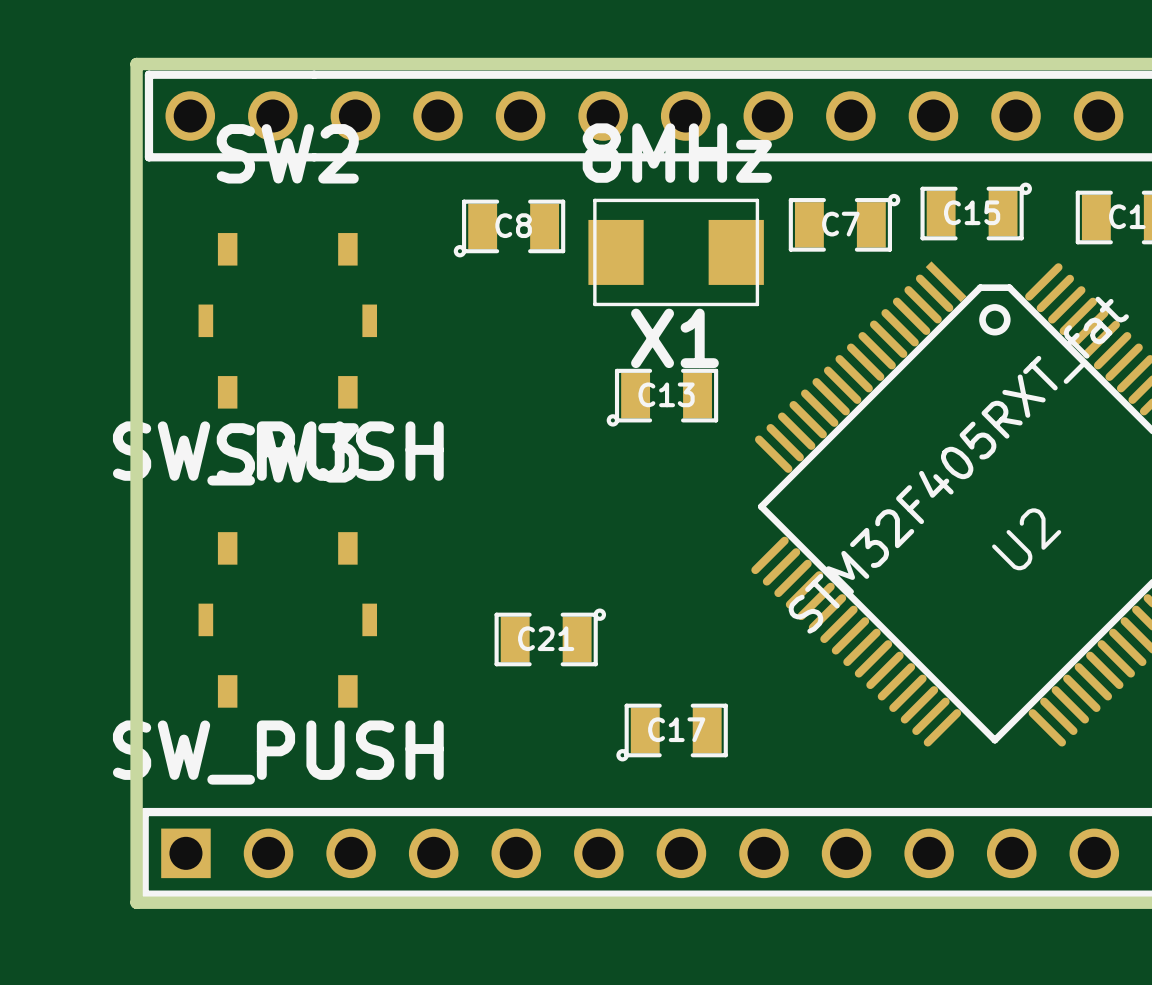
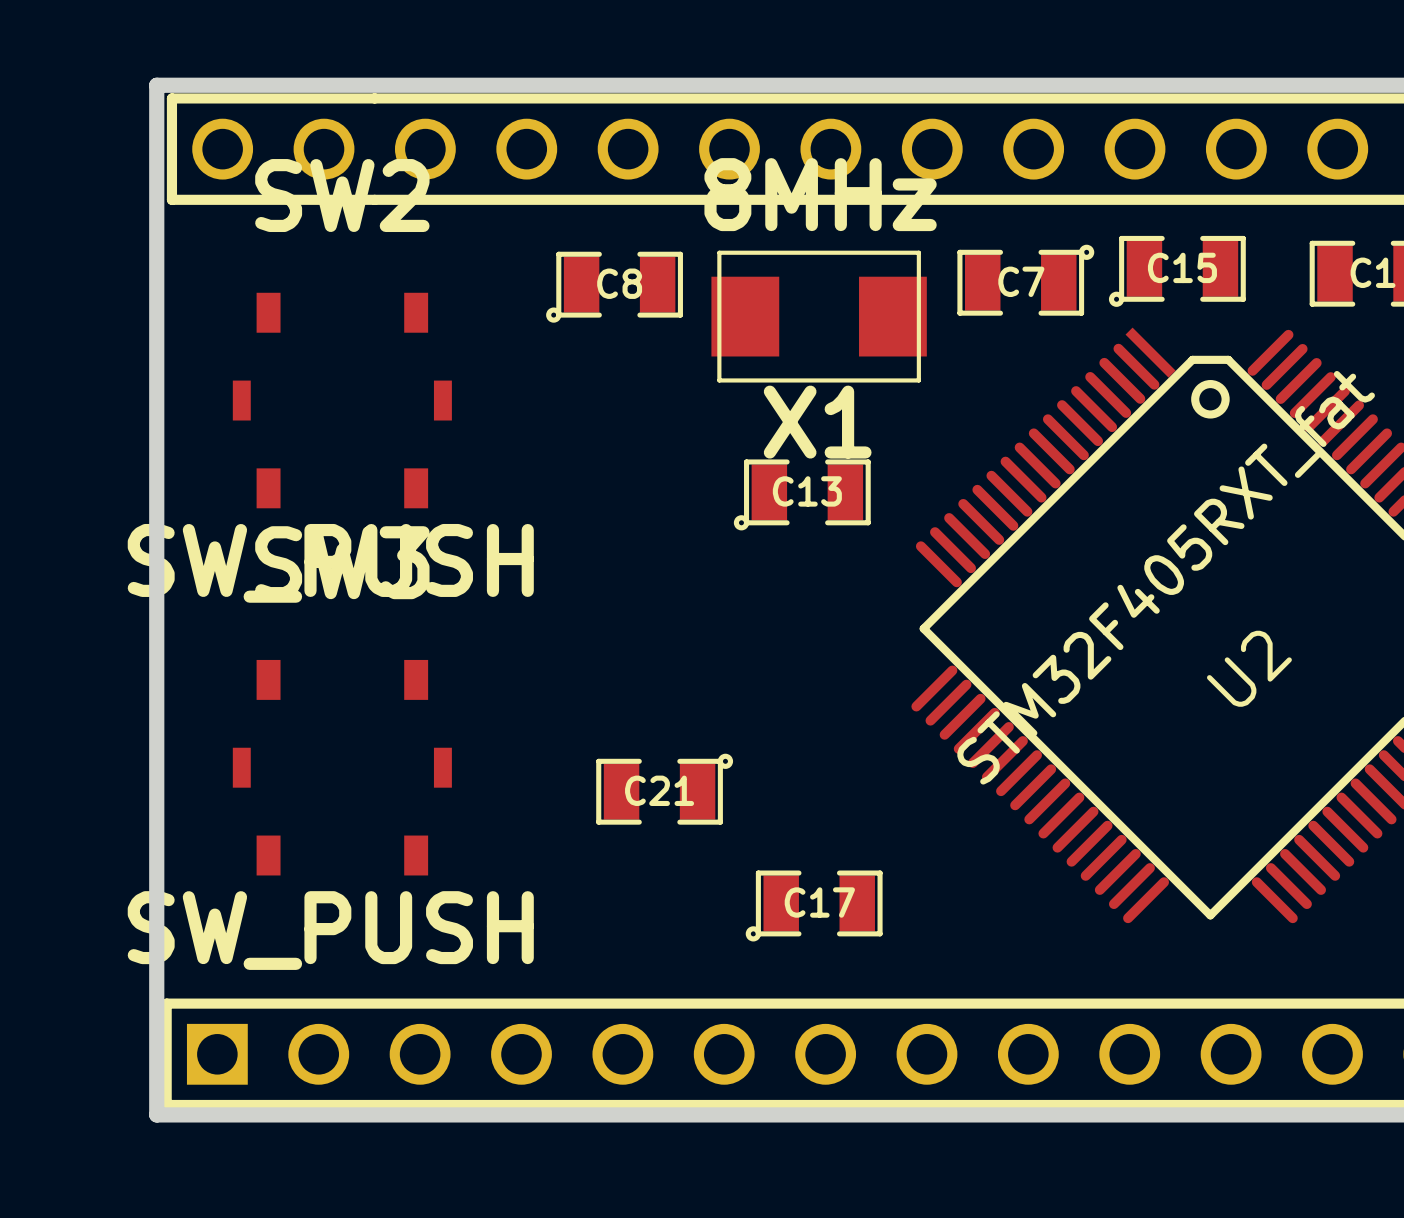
C15 rotation: 0° (976, 211) -> 180° (1177, 271)

